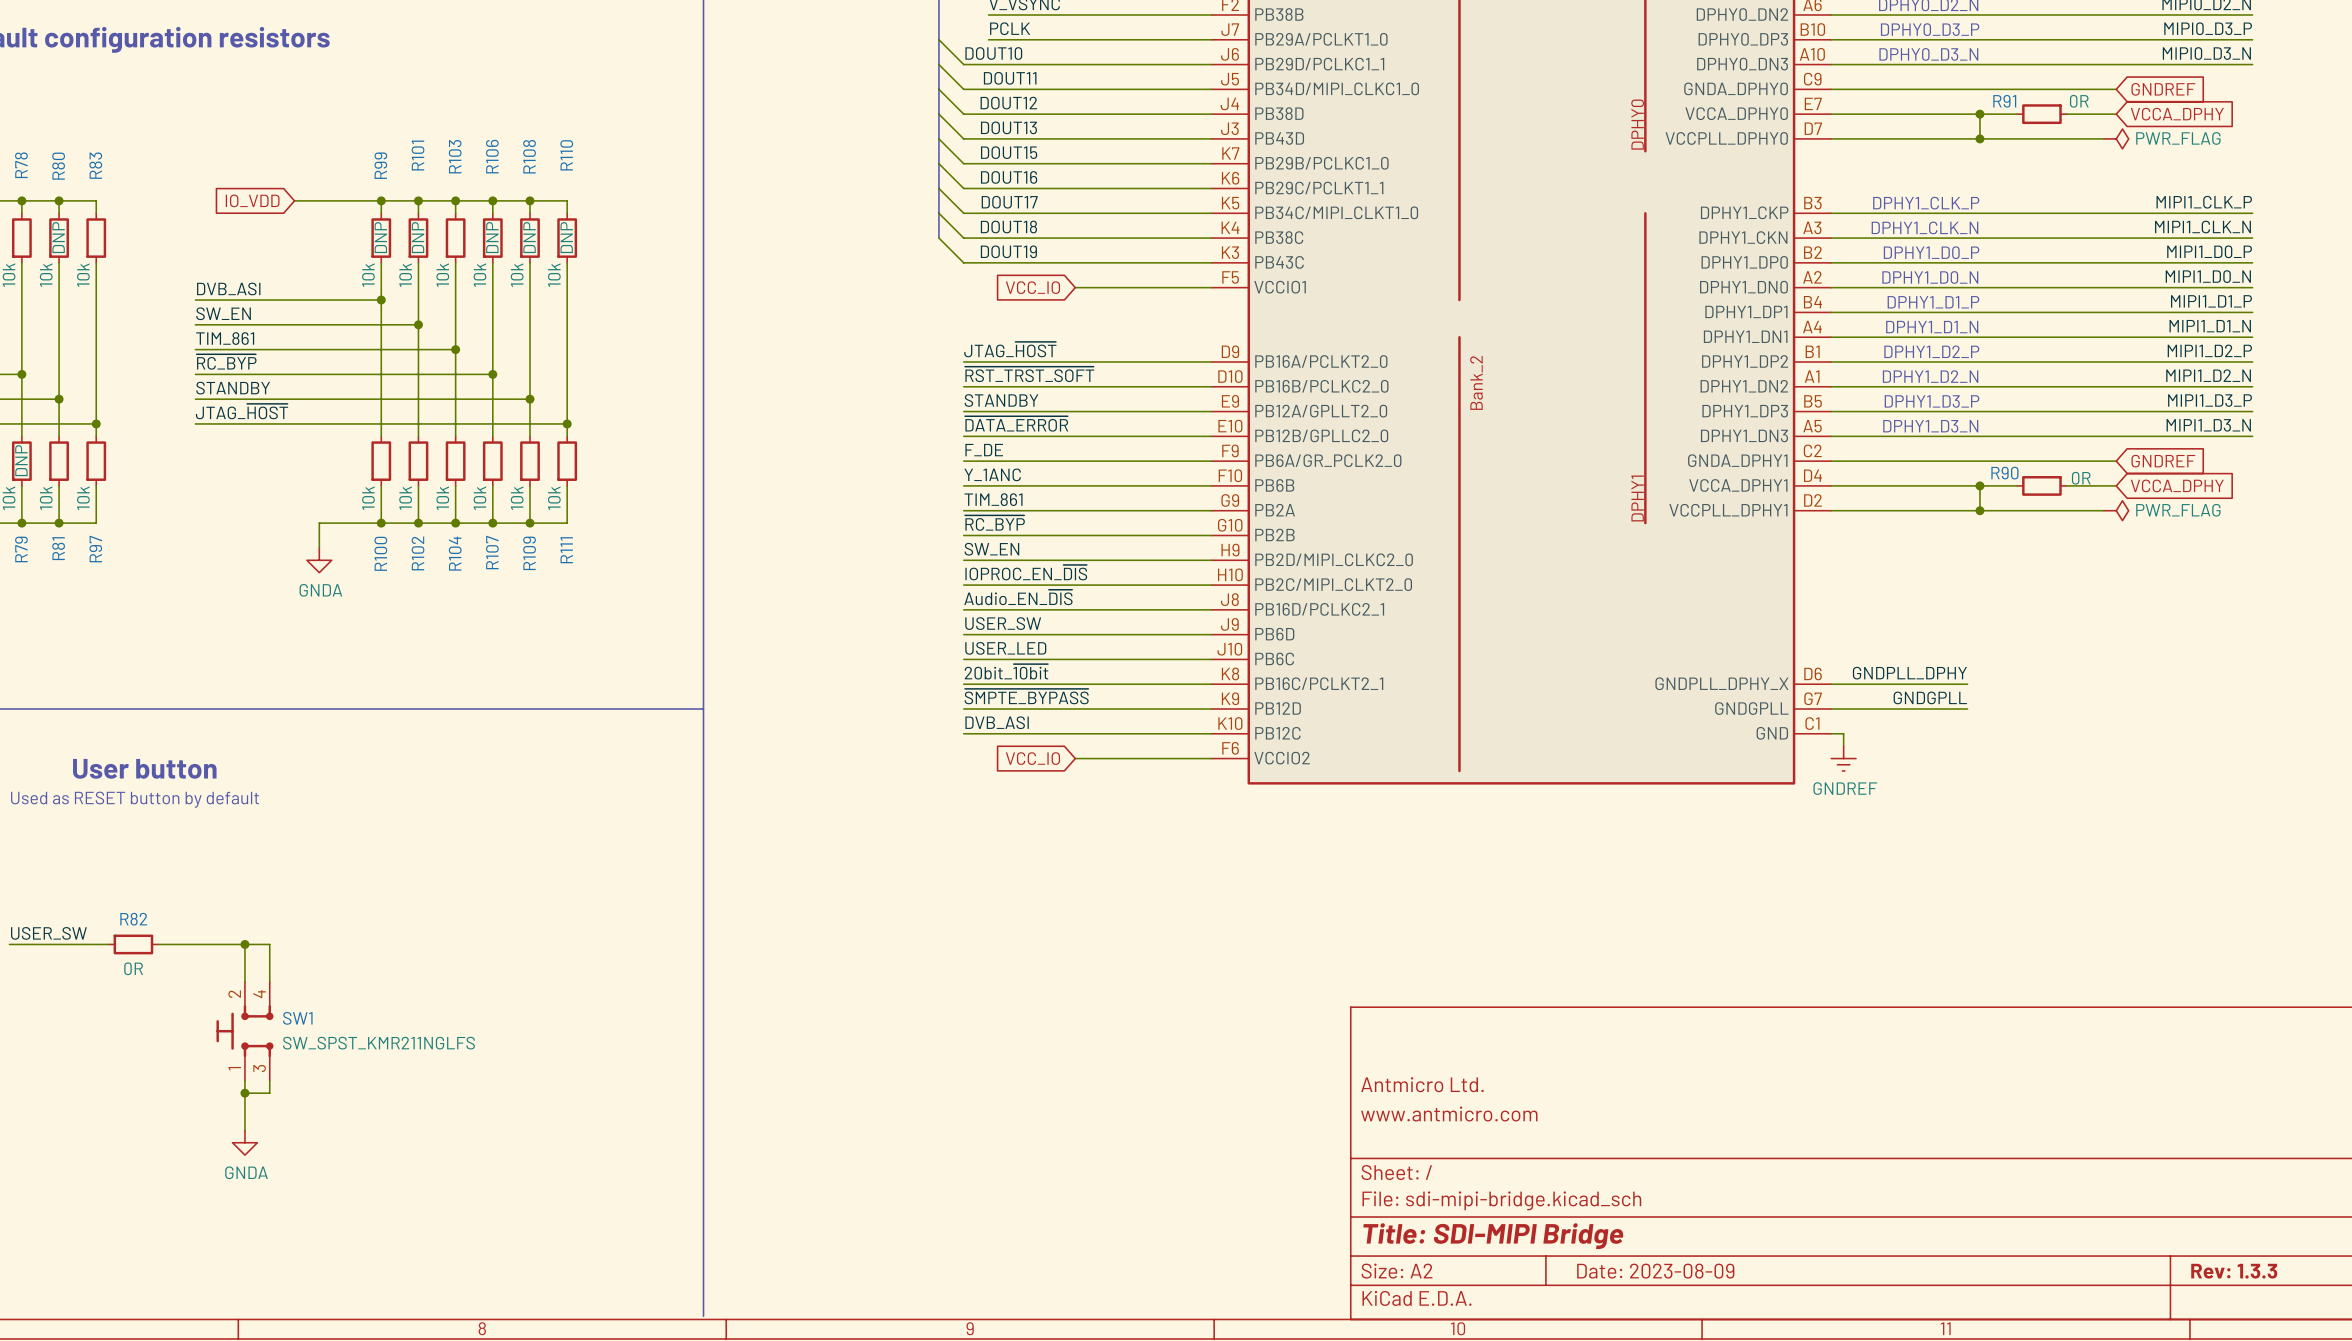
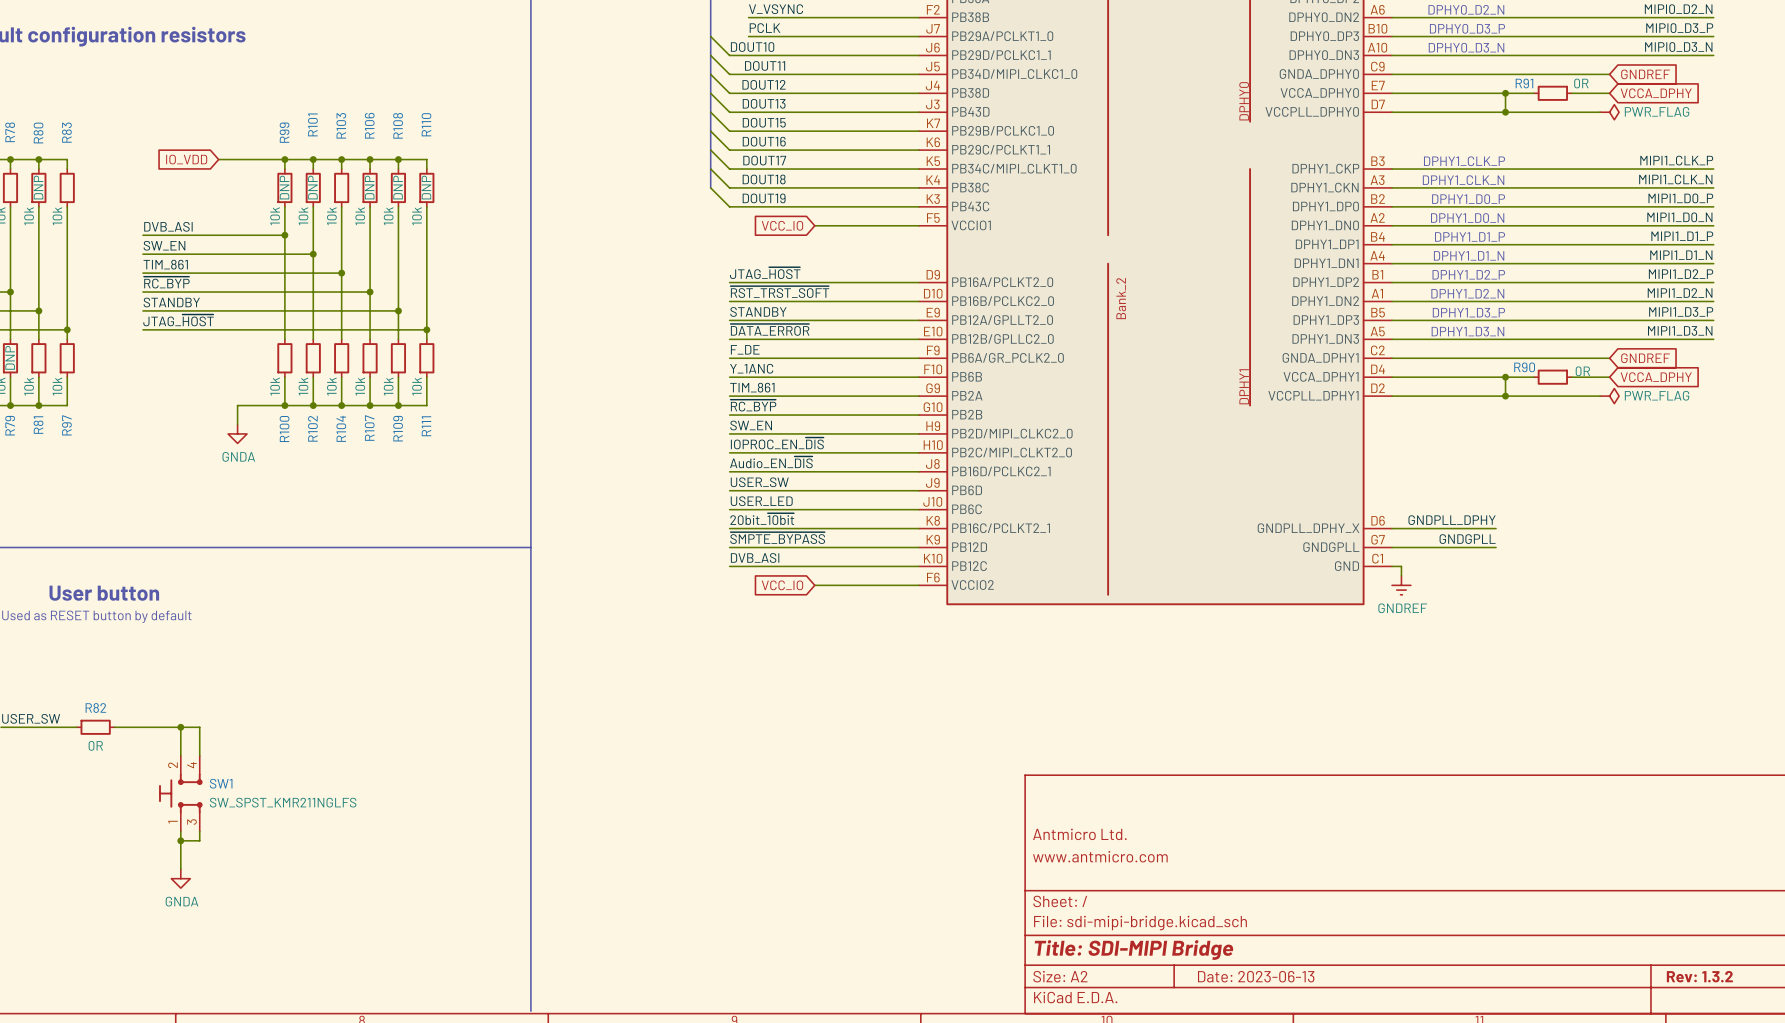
title block: Date: 2023-08-09 (1655, 1271) -> Date: 2023-06-13 (1256, 976)
title block: Rev: 1.3.3 (2234, 1271) -> Rev: 1.3.2 (1699, 976)

